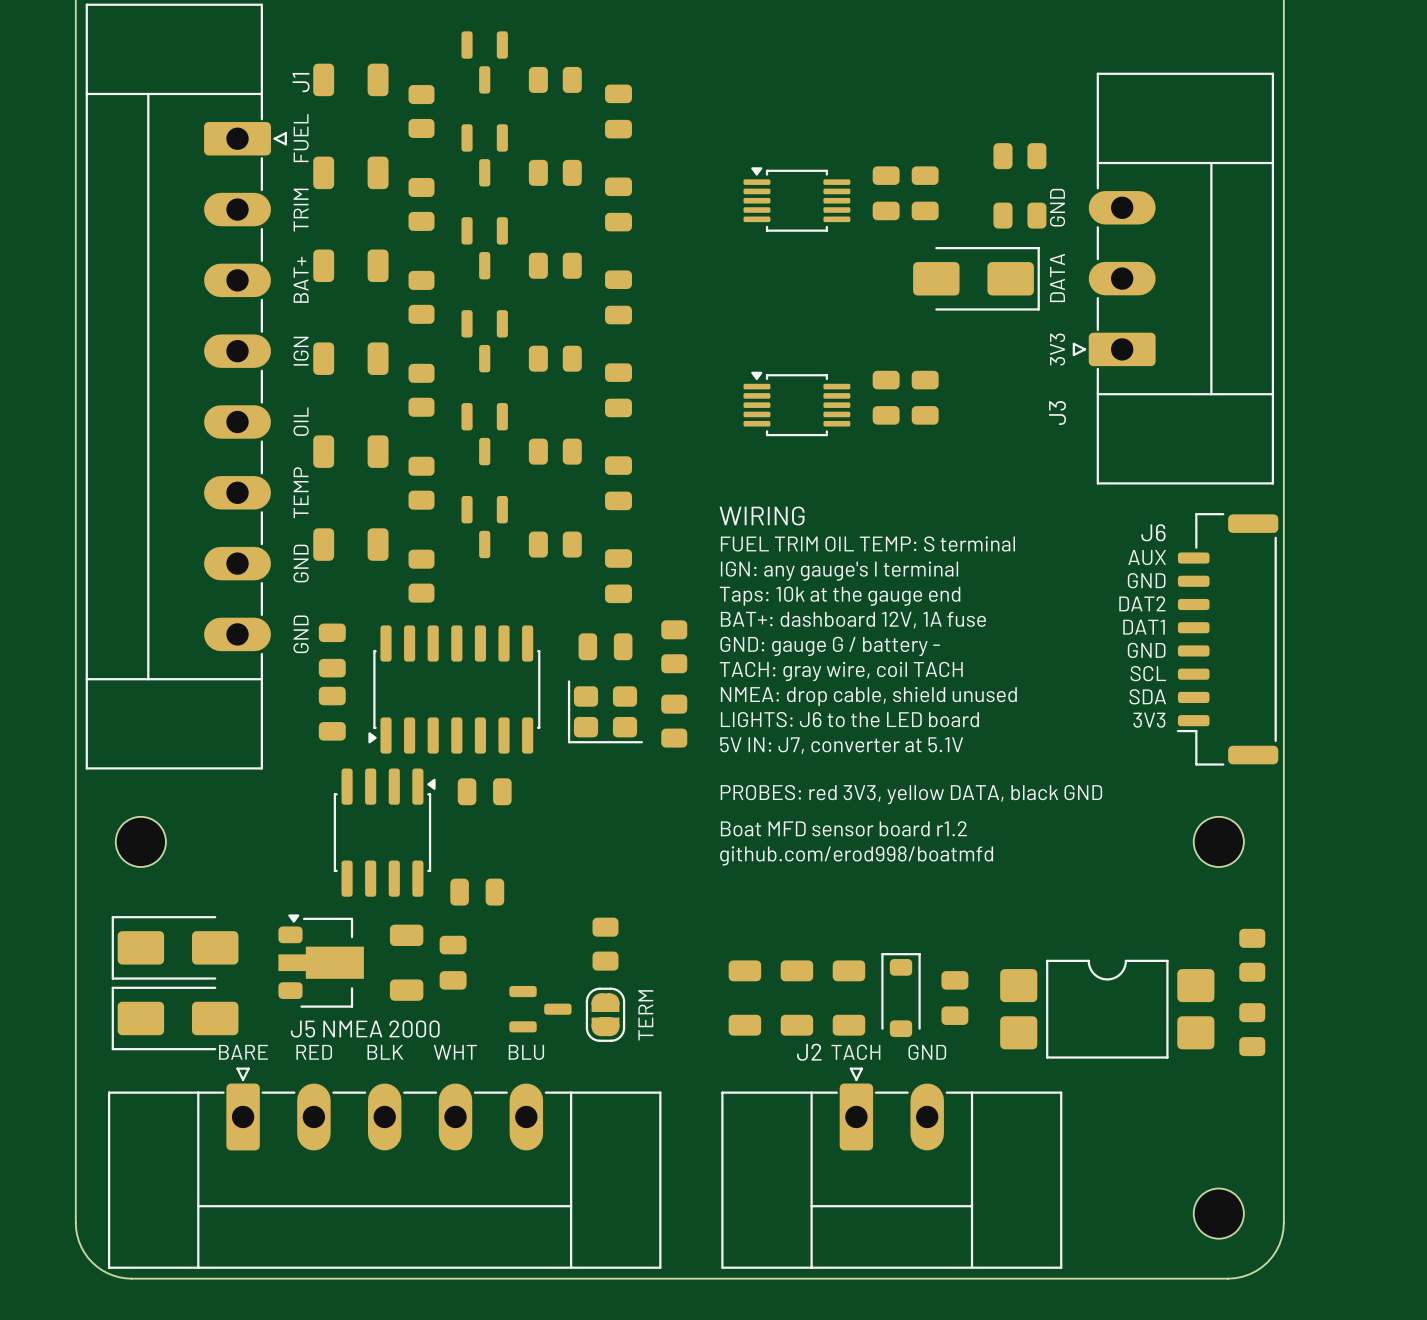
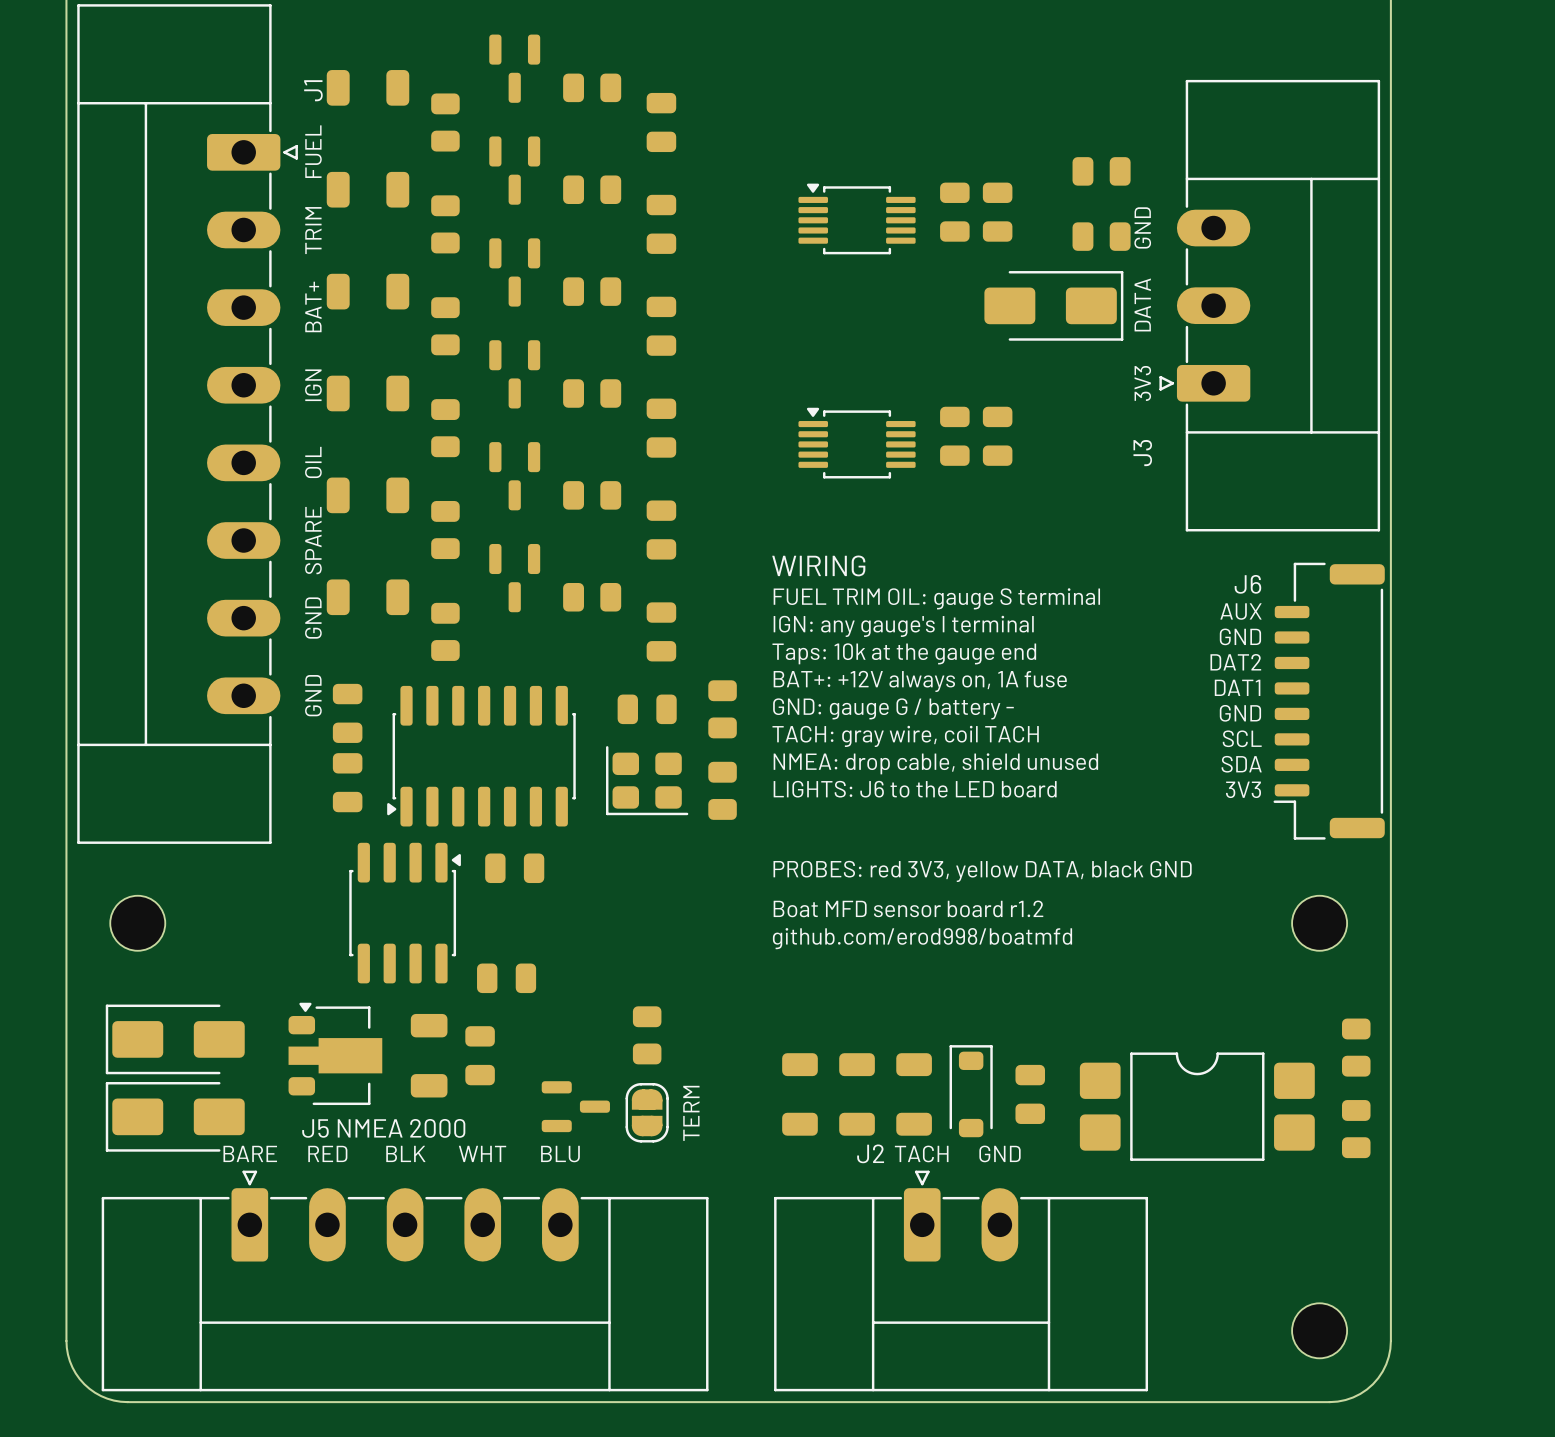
text: TEMP (301, 492) -> SPARE (313, 540)
text: FUEL TRIM OIL TEMP: S terminal (867, 543) -> FUEL TRIM OIL: gauge S terminal (936, 598)
text: BAT+: dashboard 12V, 1A fuse (853, 620) -> BAT+: +12V always on, 1A fuse (920, 681)
text: 5V IN: J7, converter at 5.1V (841, 745) -> none

